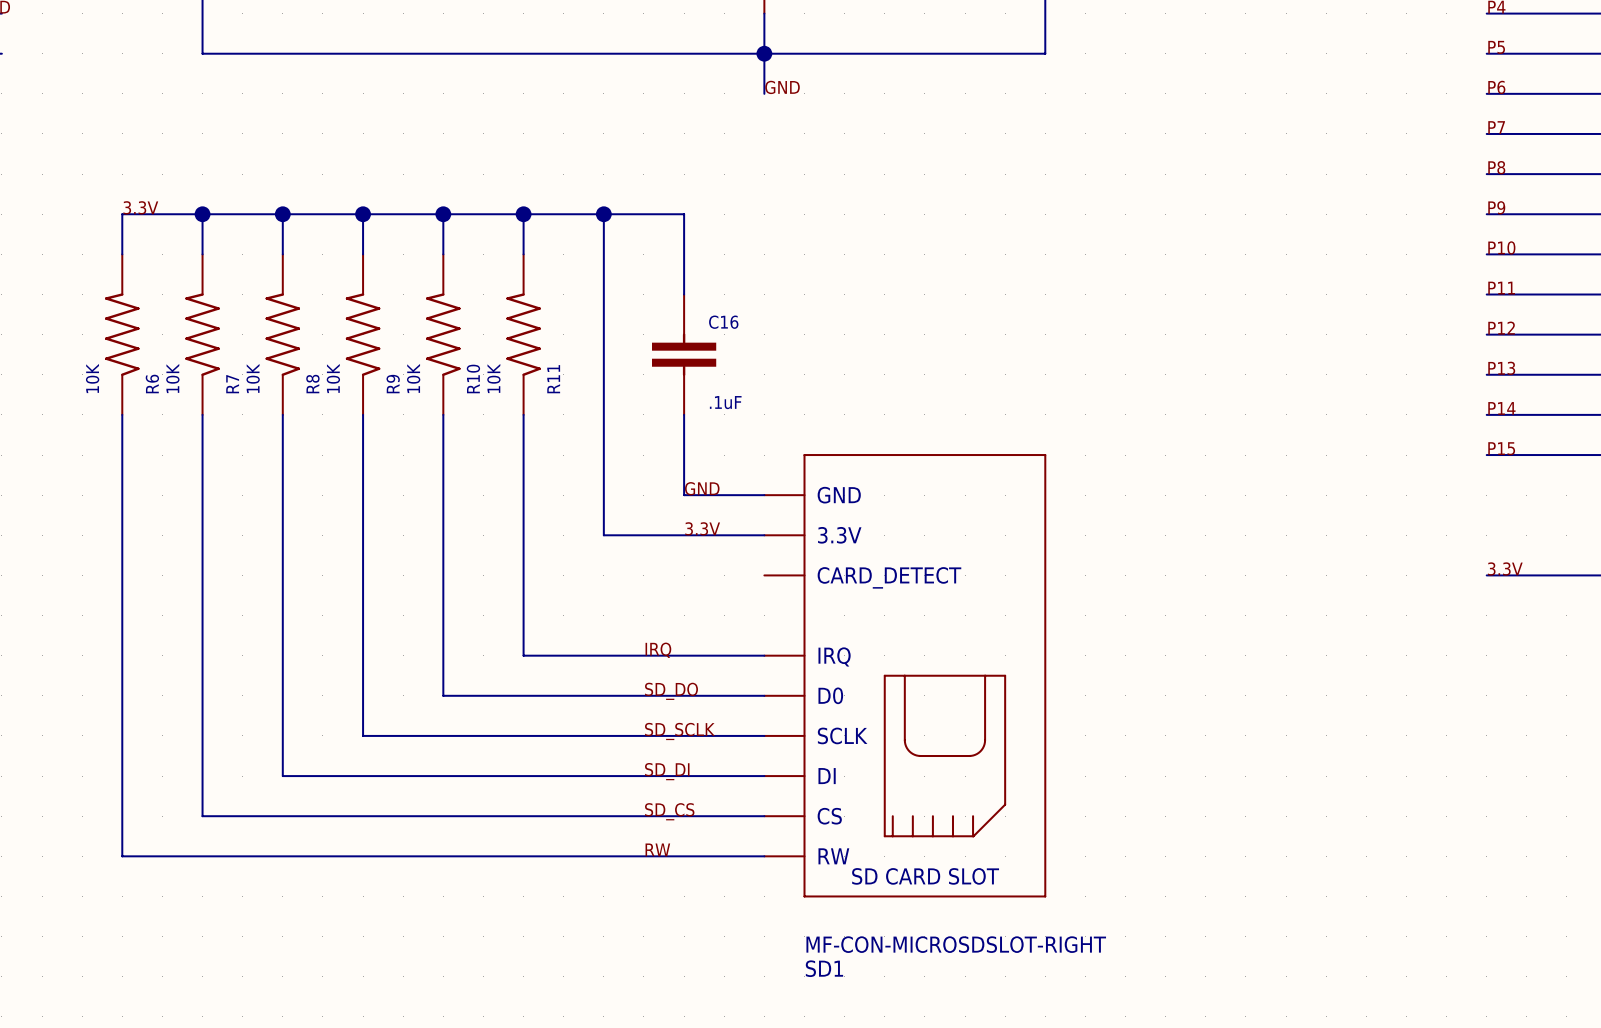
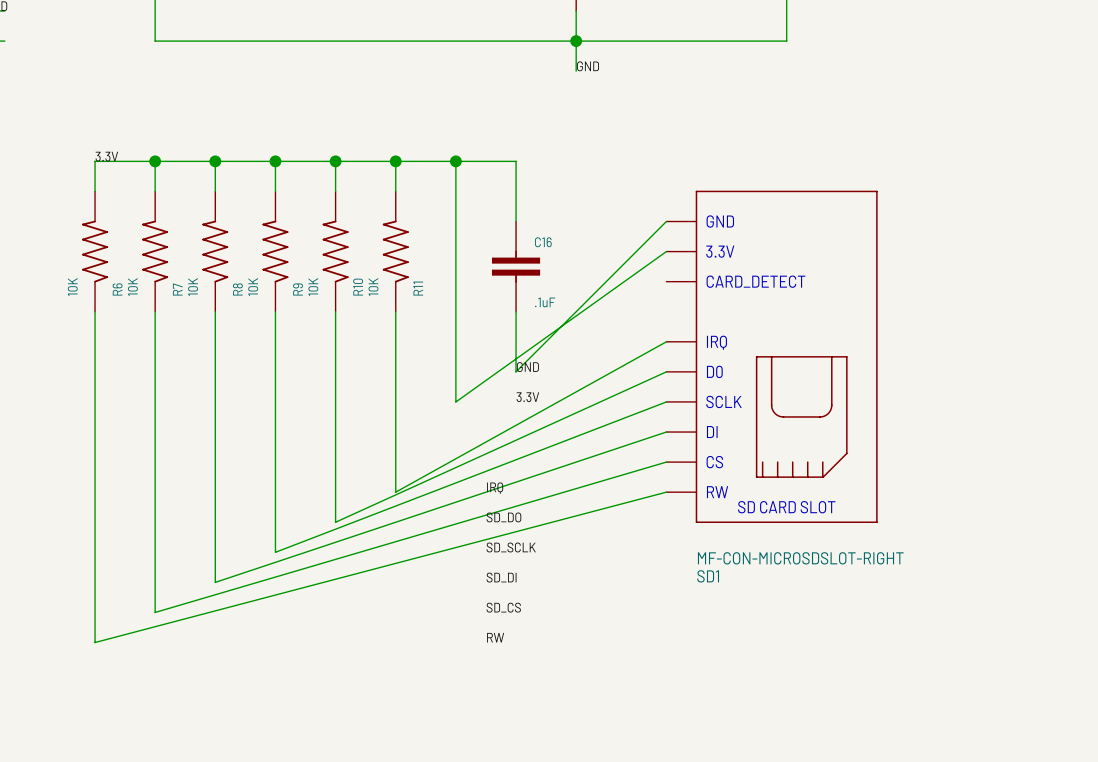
wire: (684, 495) (764, 495) -> (516, 371) (666, 221)
wire: (603, 535) (764, 535) -> (455, 401) (666, 251)
wire: (523, 655) (764, 655) -> (395, 492) (666, 341)
SD1 position: (905, 675) -> (772, 356)
wire: (443, 695) (764, 695) -> (335, 522) (666, 371)
wire: (363, 735) (764, 735) -> (275, 552) (666, 401)
wire: (282, 776) (764, 776) -> (215, 582) (666, 432)
wire: (202, 816) (764, 816) -> (155, 612) (666, 462)
wire: (122, 856) (764, 856) -> (95, 642) (666, 492)

